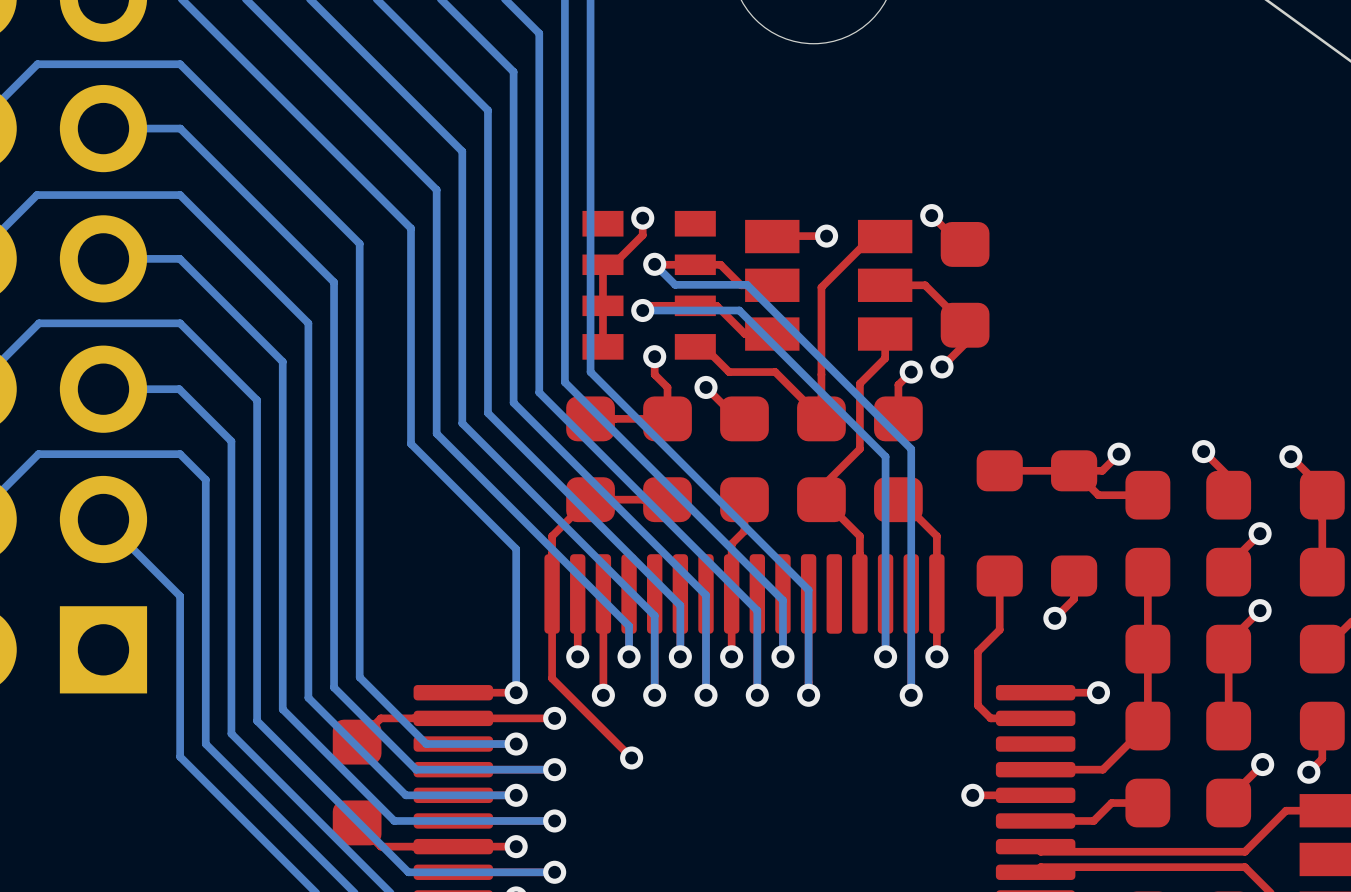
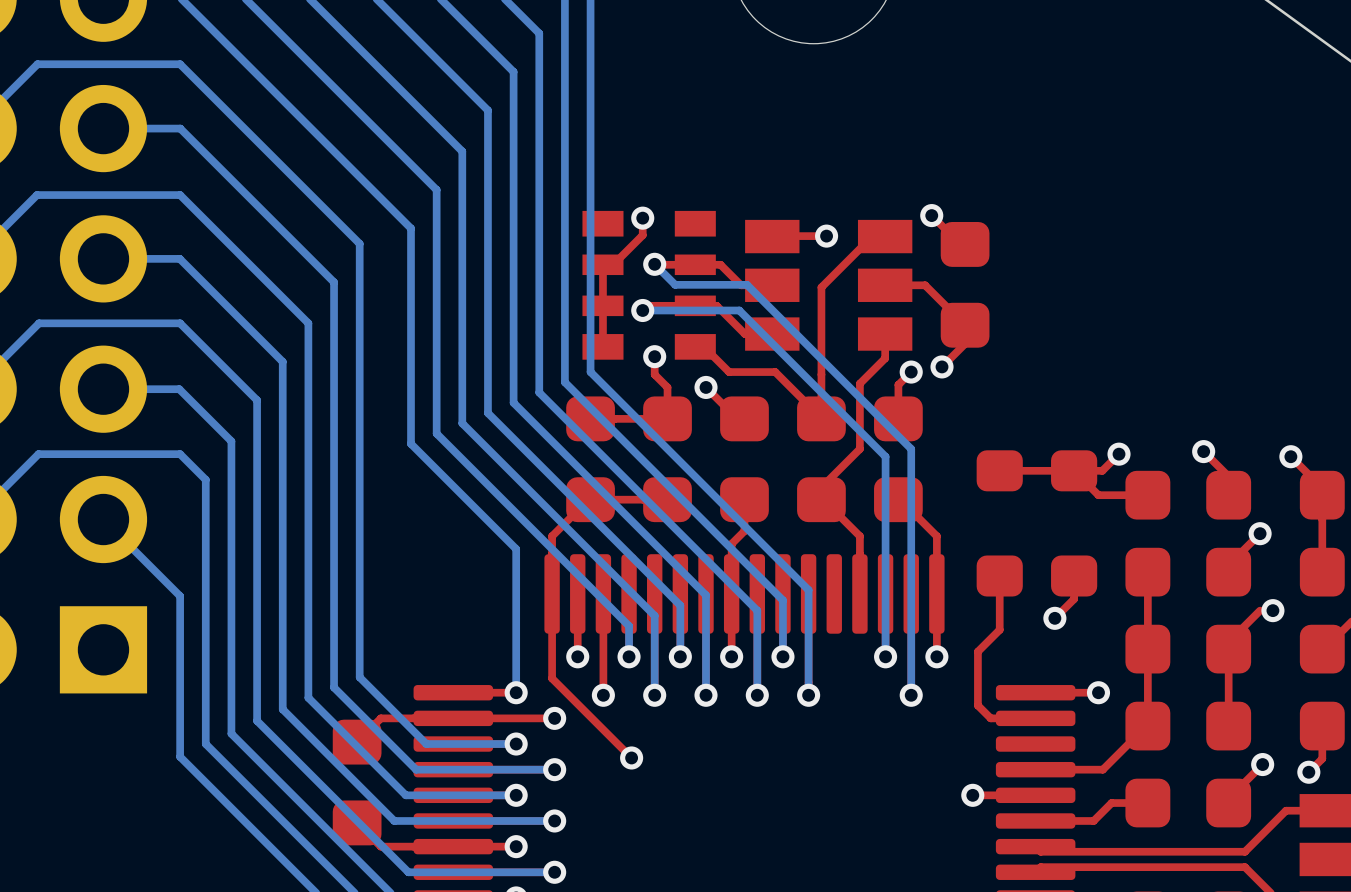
via position: (1260, 610) -> (1272, 610)

